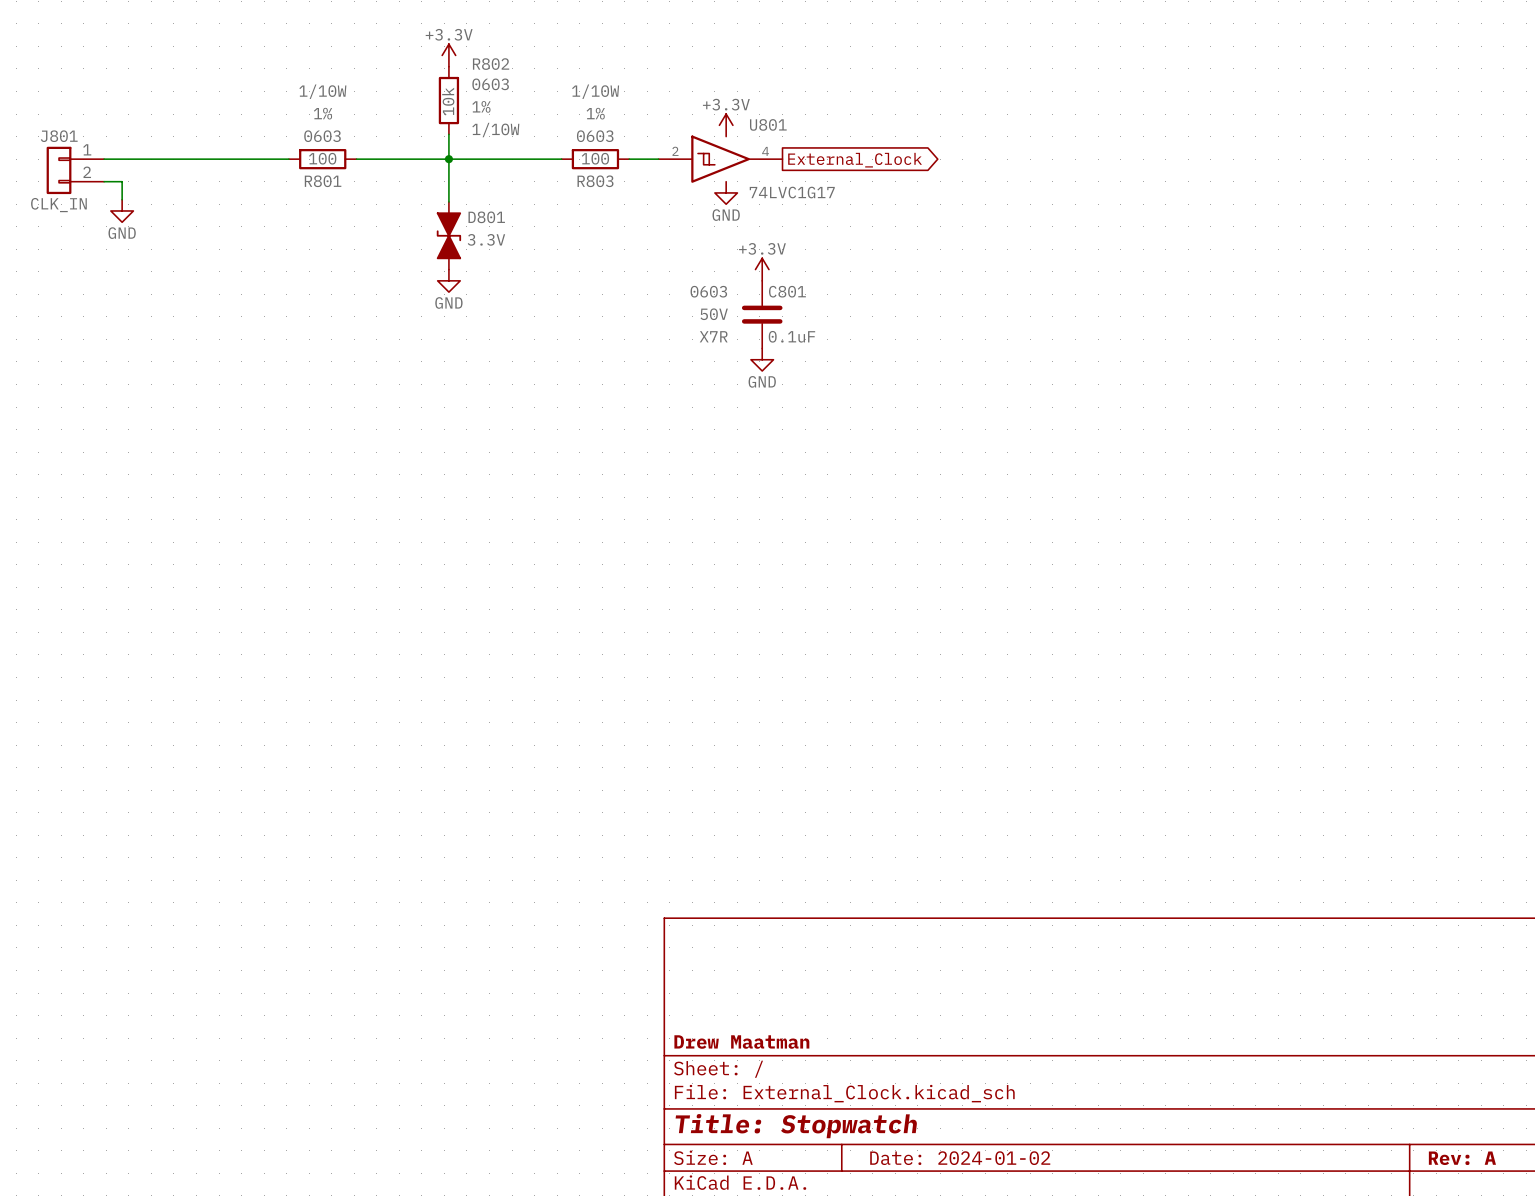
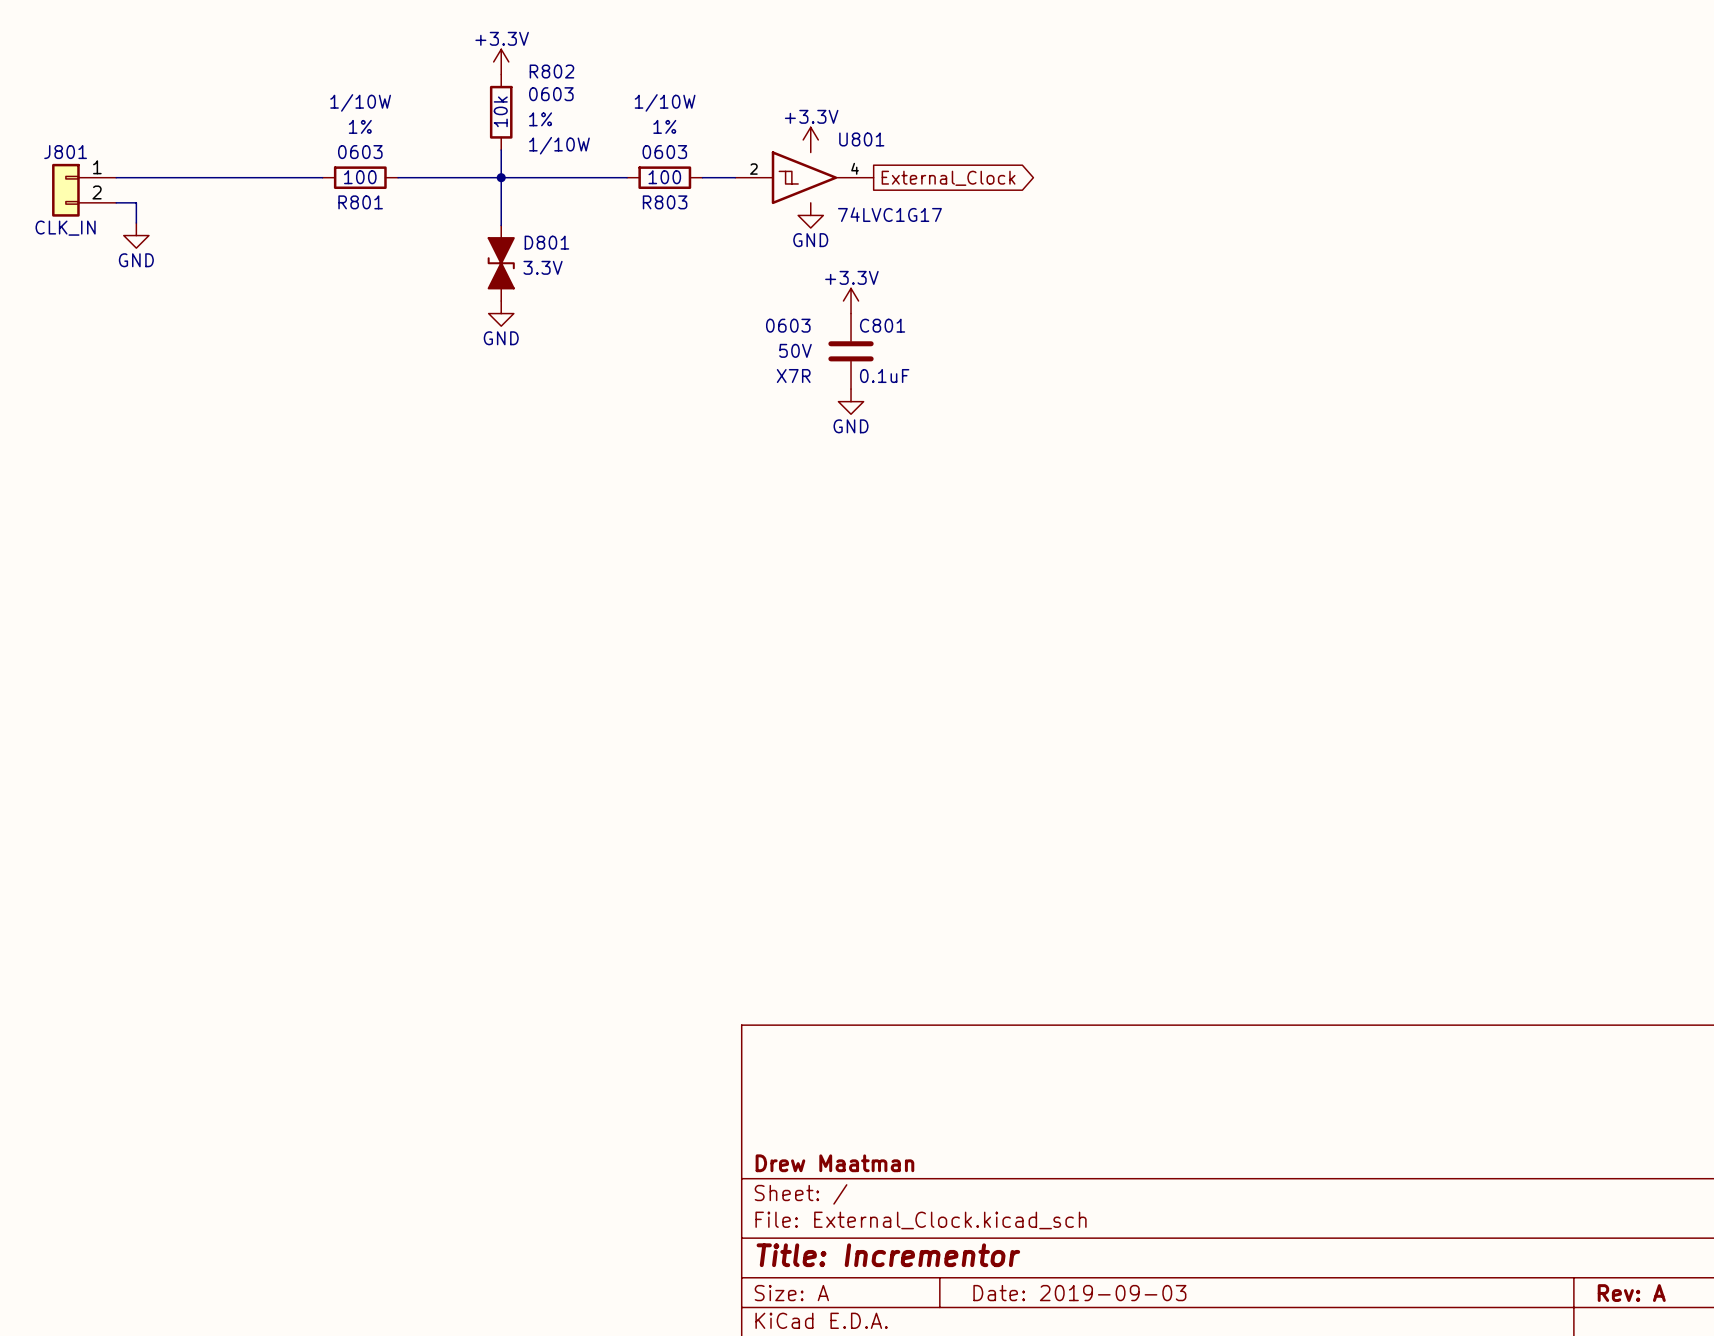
title block: Title: Stopwatch (796, 1126) -> Title: Incrementor (888, 1255)
title block: Date: 2024-01-02 (960, 1158) -> Date: 2019-09-03 (1079, 1293)

